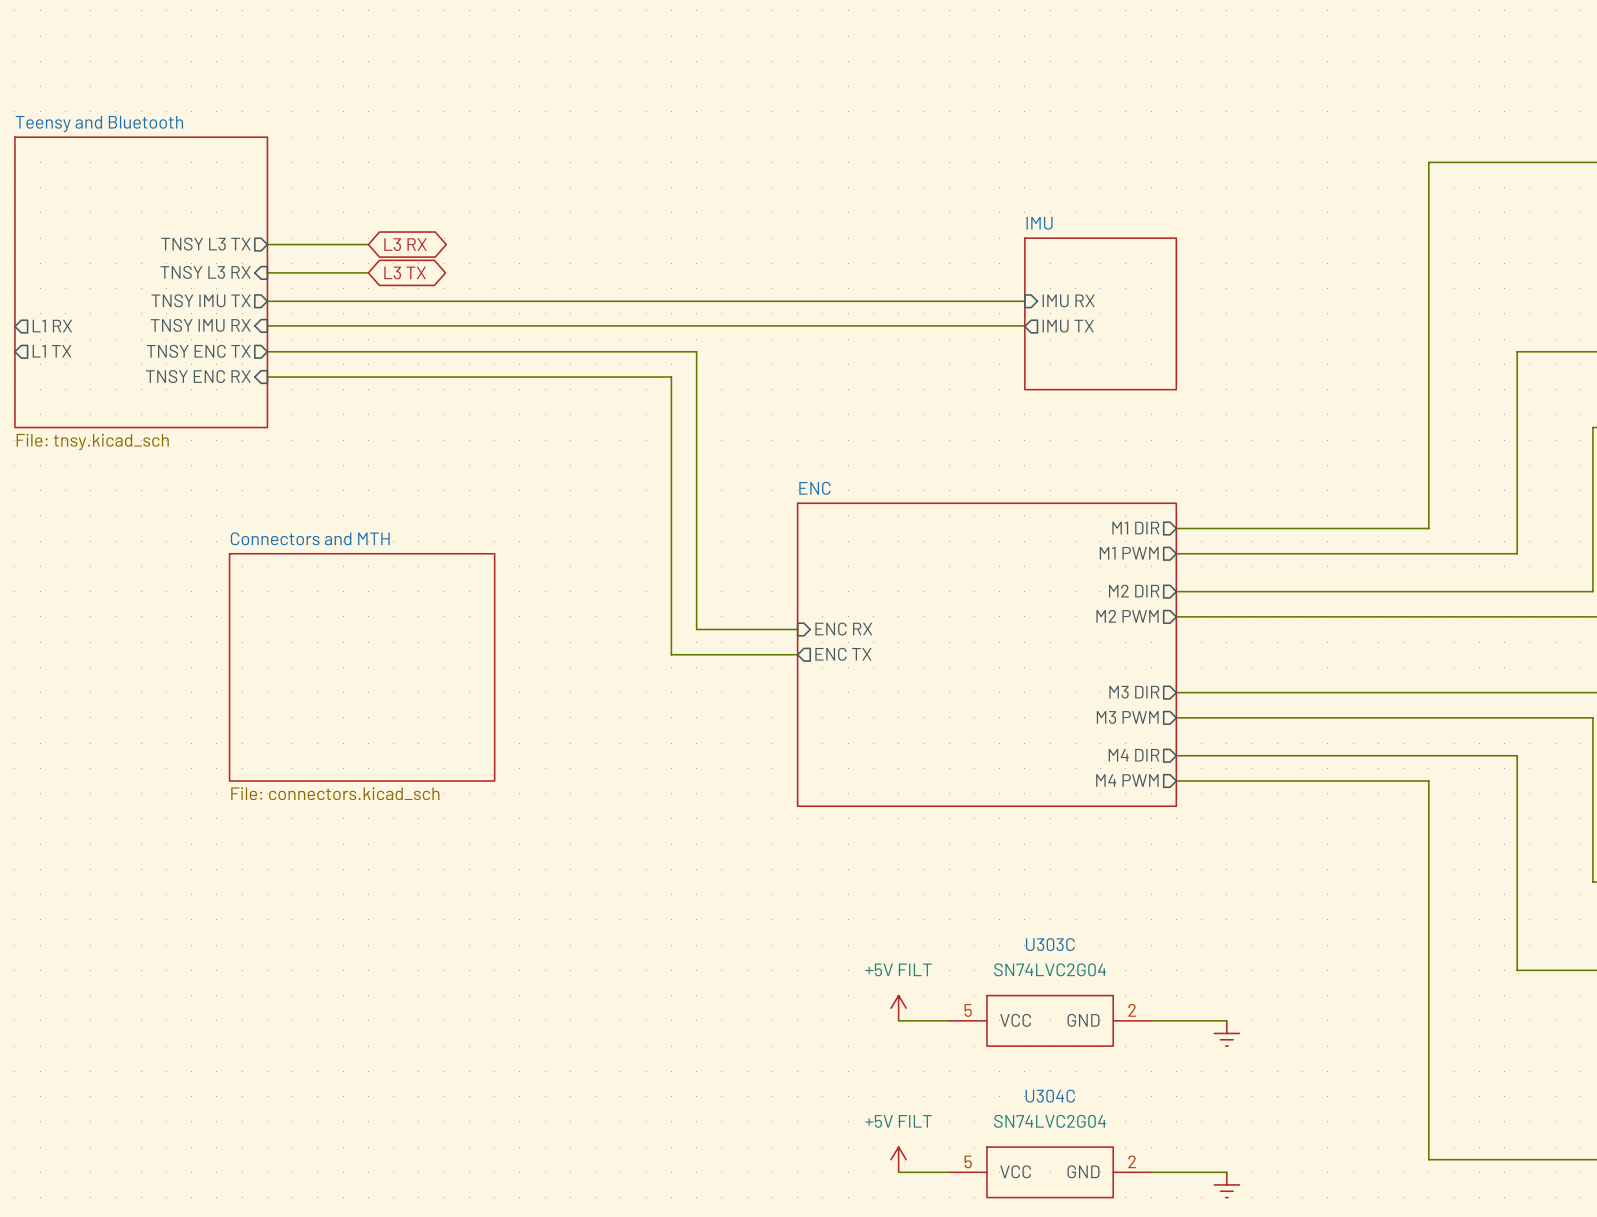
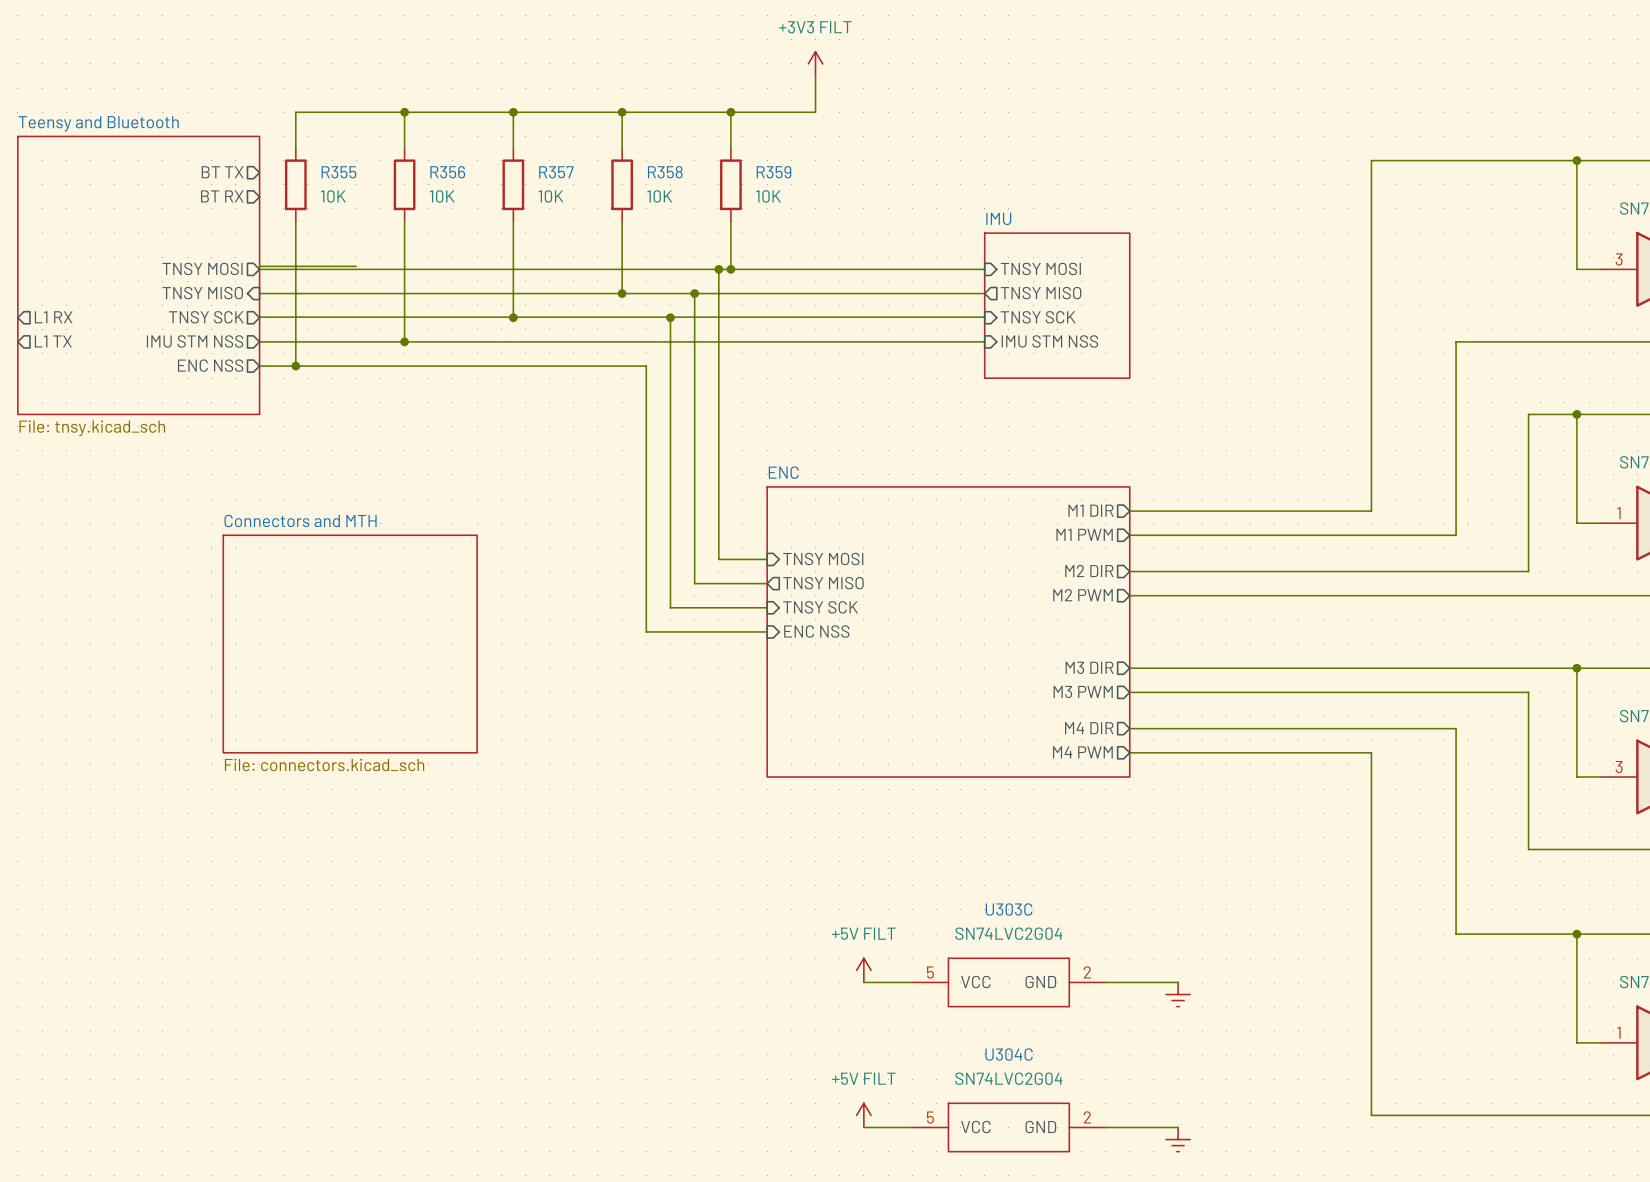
power symbol: none -> +3V3 FILT (815, 63)
wire: none -> (815, 76) (815, 112) (295, 112) (295, 148)
wire: none -> (404, 112) (404, 148)
junction: none -> (404, 112)
wire: none -> (513, 112) (513, 148)
junction: none -> (513, 112)
wire: none -> (622, 112) (622, 148)
junction: none -> (622, 112)
wire: none -> (730, 112) (730, 148)
junction: none -> (730, 112)
sheet pin: none -> BT TX (222, 172)
R355: none -> 10K (295, 184)
R356: none -> 10K (404, 184)
R357: none -> 10K (513, 184)
R358: none -> 10K (622, 184)
R359: none -> 10K (730, 184)
sheet pin: none -> BT RX (222, 196)
wire: none -> (295, 221) (295, 366)
wire: none -> (404, 221) (404, 341)
wire: none -> (513, 221) (513, 317)
wire: none -> (622, 221) (622, 293)
wire: none -> (730, 221) (730, 269)
sheet pin: TNSY L3 TX (206, 244) -> none
wire: (267, 244) (368, 244) -> none
global label: L3 RX (405, 244) -> none
sheet pin shape: input (205, 272) -> output (202, 268)
sheet pin: TNSY L3 RX (205, 272) -> TNSY MOSI (202, 268)
global label: L3 TX (405, 272) -> none
sheet pin: none -> TNSY MOSI (1040, 268)
wire: none -> (259, 269) (984, 269)
wire: none -> (718, 269) (718, 559) (767, 559)
junction: none -> (718, 269)
junction: none -> (730, 269)
sheet pin shape: output (201, 300) -> input (202, 293)
sheet pin: TNSY IMU TX (201, 300) -> TNSY MISO (202, 293)
sheet pin shape: input (1068, 300) -> output (1041, 293)
sheet pin: IMU RX (1068, 300) -> TNSY MISO (1041, 293)
junction: none -> (622, 293)
wire: none -> (694, 293) (694, 583) (767, 583)
junction: none -> (694, 293)
sheet pin shape: input (200, 325) -> output (206, 317)
sheet pin: TNSY IMU RX (200, 325) -> TNSY SCK (206, 317)
junction: none -> (513, 317)
wire: none -> (670, 317) (670, 341) (984, 341)
junction: none -> (670, 317)
sheet pin shape: output (1068, 326) -> input (1038, 317)
sheet pin: IMU TX (1068, 326) -> TNSY SCK (1038, 317)
sheet pin: TNSY ENC TX (198, 351) -> IMU STM NSS (195, 341)
junction: none -> (404, 341)
sheet pin: none -> IMU STM NSS (1049, 341)
sheet pin shape: input (198, 376) -> output (210, 365)
sheet pin: TNSY ENC RX (198, 376) -> ENC NSS (210, 365)
junction: none -> (295, 366)
sheet pin: none -> TNSY MOSI (823, 558)
sheet pin: none -> TNSY MISO (823, 583)
sheet pin: ENC RX (843, 629) -> TNSY SCK (820, 607)
sheet pin shape: output (843, 654) -> input (816, 631)
sheet pin: ENC TX (843, 654) -> ENC NSS (816, 631)

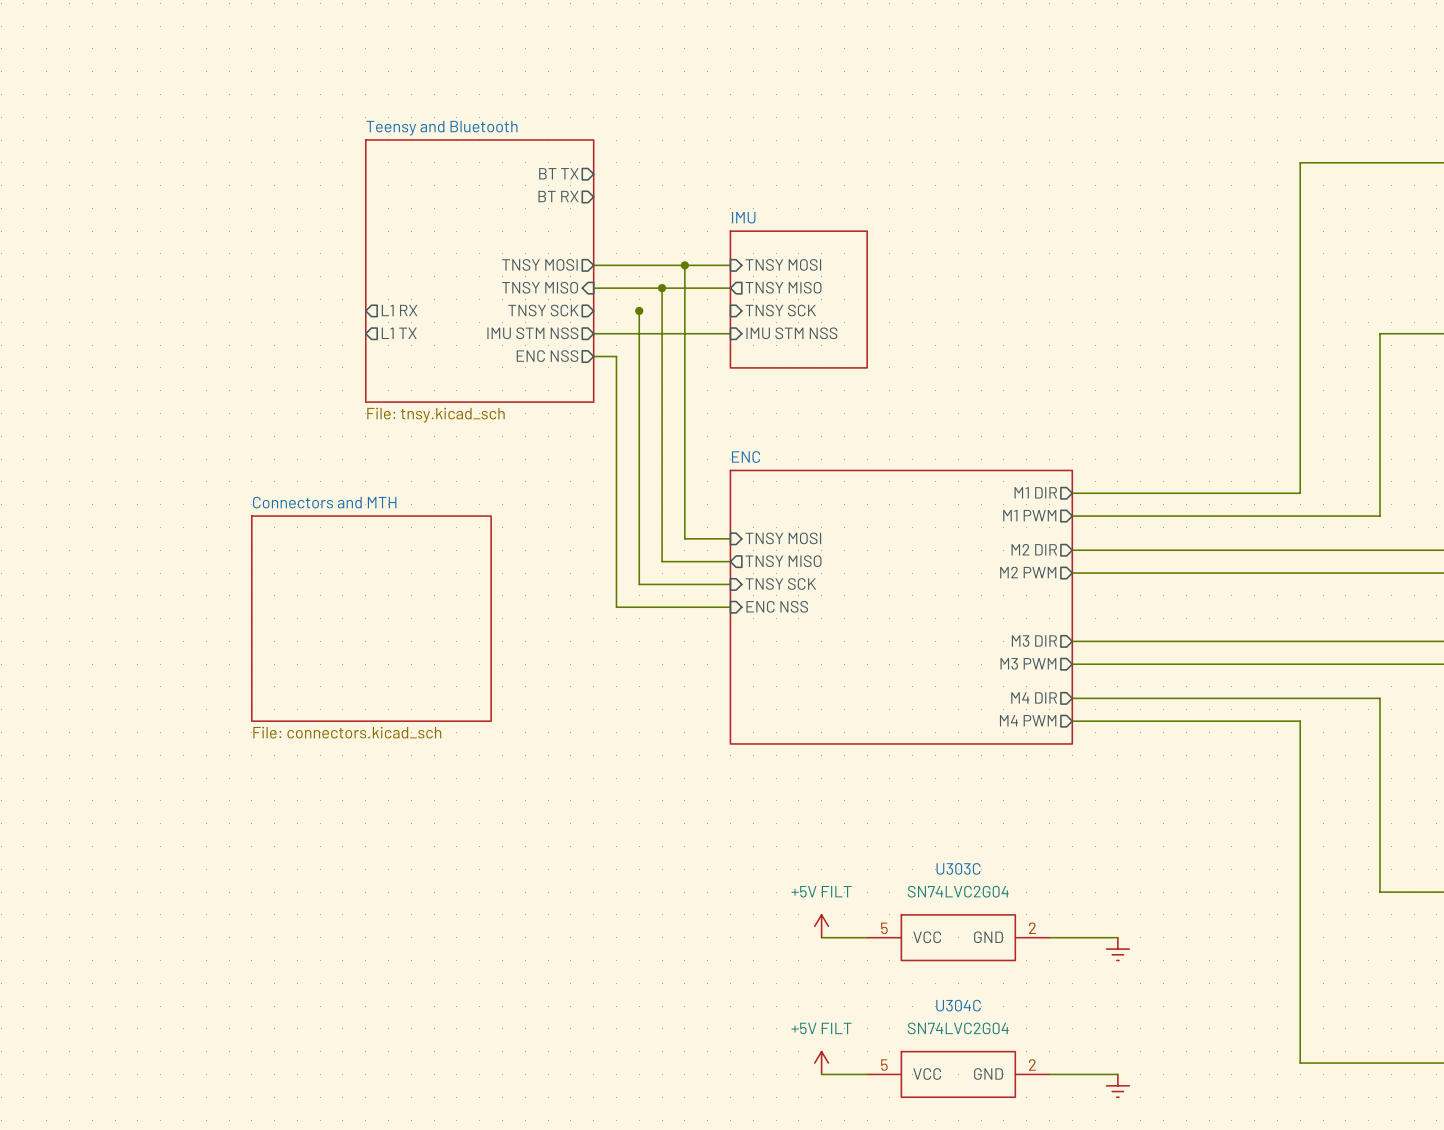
power symbol: +3V3 FILT (815, 63) -> none
wire: (815, 76) (815, 112) (295, 112) (295, 148) -> none
wire: (404, 112) (404, 148) -> none
junction: (404, 112) -> none
wire: (513, 112) (513, 148) -> none
junction: (513, 112) -> none
wire: (622, 112) (622, 148) -> none
junction: (622, 112) -> none
wire: (730, 112) (730, 148) -> none
junction: (730, 112) -> none
sheet pin: BT TX (222, 172) -> none
sheet pin: none -> BT TX (558, 173)
R355: 10K (295, 184) -> none
R356: 10K (404, 184) -> none
R357: 10K (513, 184) -> none
R358: 10K (622, 184) -> none
R359: 10K (730, 184) -> none
sheet pin: BT RX (222, 196) -> none
sheet pin: none -> BT RX (558, 196)
wire: (295, 221) (295, 366) -> none
wire: (404, 221) (404, 341) -> none
wire: (513, 221) (513, 317) -> none
wire: (622, 221) (622, 293) (259, 293) -> none
wire: (730, 221) (730, 269) -> none
wire: (259, 266) (356, 266) -> none
sheet pin: TNSY MOSI (202, 268) -> none
sheet pin: none -> TNSY MOSI (539, 264)
sheet pin: none -> TNSY MOSI (783, 264)
sheet pin: TNSY MOSI (1040, 268) -> none
wire: (259, 269) (622, 269) -> none
junction: (730, 269) -> none
wire: (767, 269) (984, 269) -> none
sheet Teensy and Bluetooth: File: tnsy.kicad_sch (138, 275) -> none
sheet Teensy and Bluetooth: none -> File: tnsy.kicad_sch (479, 271)
sheet pin: TNSY MISO (202, 293) -> none
sheet pin: none -> TNSY MISO (540, 287)
junction: (622, 293) -> none
wire: (767, 293) (984, 293) -> none
sheet pin: none -> TNSY MISO (783, 287)
sheet pin: TNSY MISO (1041, 293) -> none
sheet IMU position: (1057, 305) -> (798, 299)
sheet pin: L1 RX (53, 317) -> none
sheet pin: TNSY SCK (206, 317) -> none
wire: (259, 317) (984, 317) -> none
sheet pin: none -> L1 RX (399, 310)
junction: (513, 317) -> none
sheet pin: none -> TNSY SCK (543, 310)
sheet pin: none -> TNSY SCK (780, 310)
sheet pin: TNSY SCK (1038, 317) -> none
sheet pin: L1 TX (53, 341) -> none
sheet pin: IMU STM NSS (195, 341) -> none
wire: (259, 341) (622, 341) -> none
junction: (404, 341) -> none
sheet pin: none -> L1 TX (399, 333)
sheet pin: none -> IMU STM NSS (532, 333)
wire: (767, 341) (984, 341) -> none
sheet pin: none -> IMU STM NSS (791, 333)
sheet pin: IMU STM NSS (1049, 341) -> none
sheet pin: ENC NSS (210, 365) -> none
sheet pin: none -> ENC NSS (547, 356)
wire: (259, 366) (622, 366) -> none
junction: (295, 366) -> none
sheet Connectors and MTH position: (350, 644) -> (371, 618)

